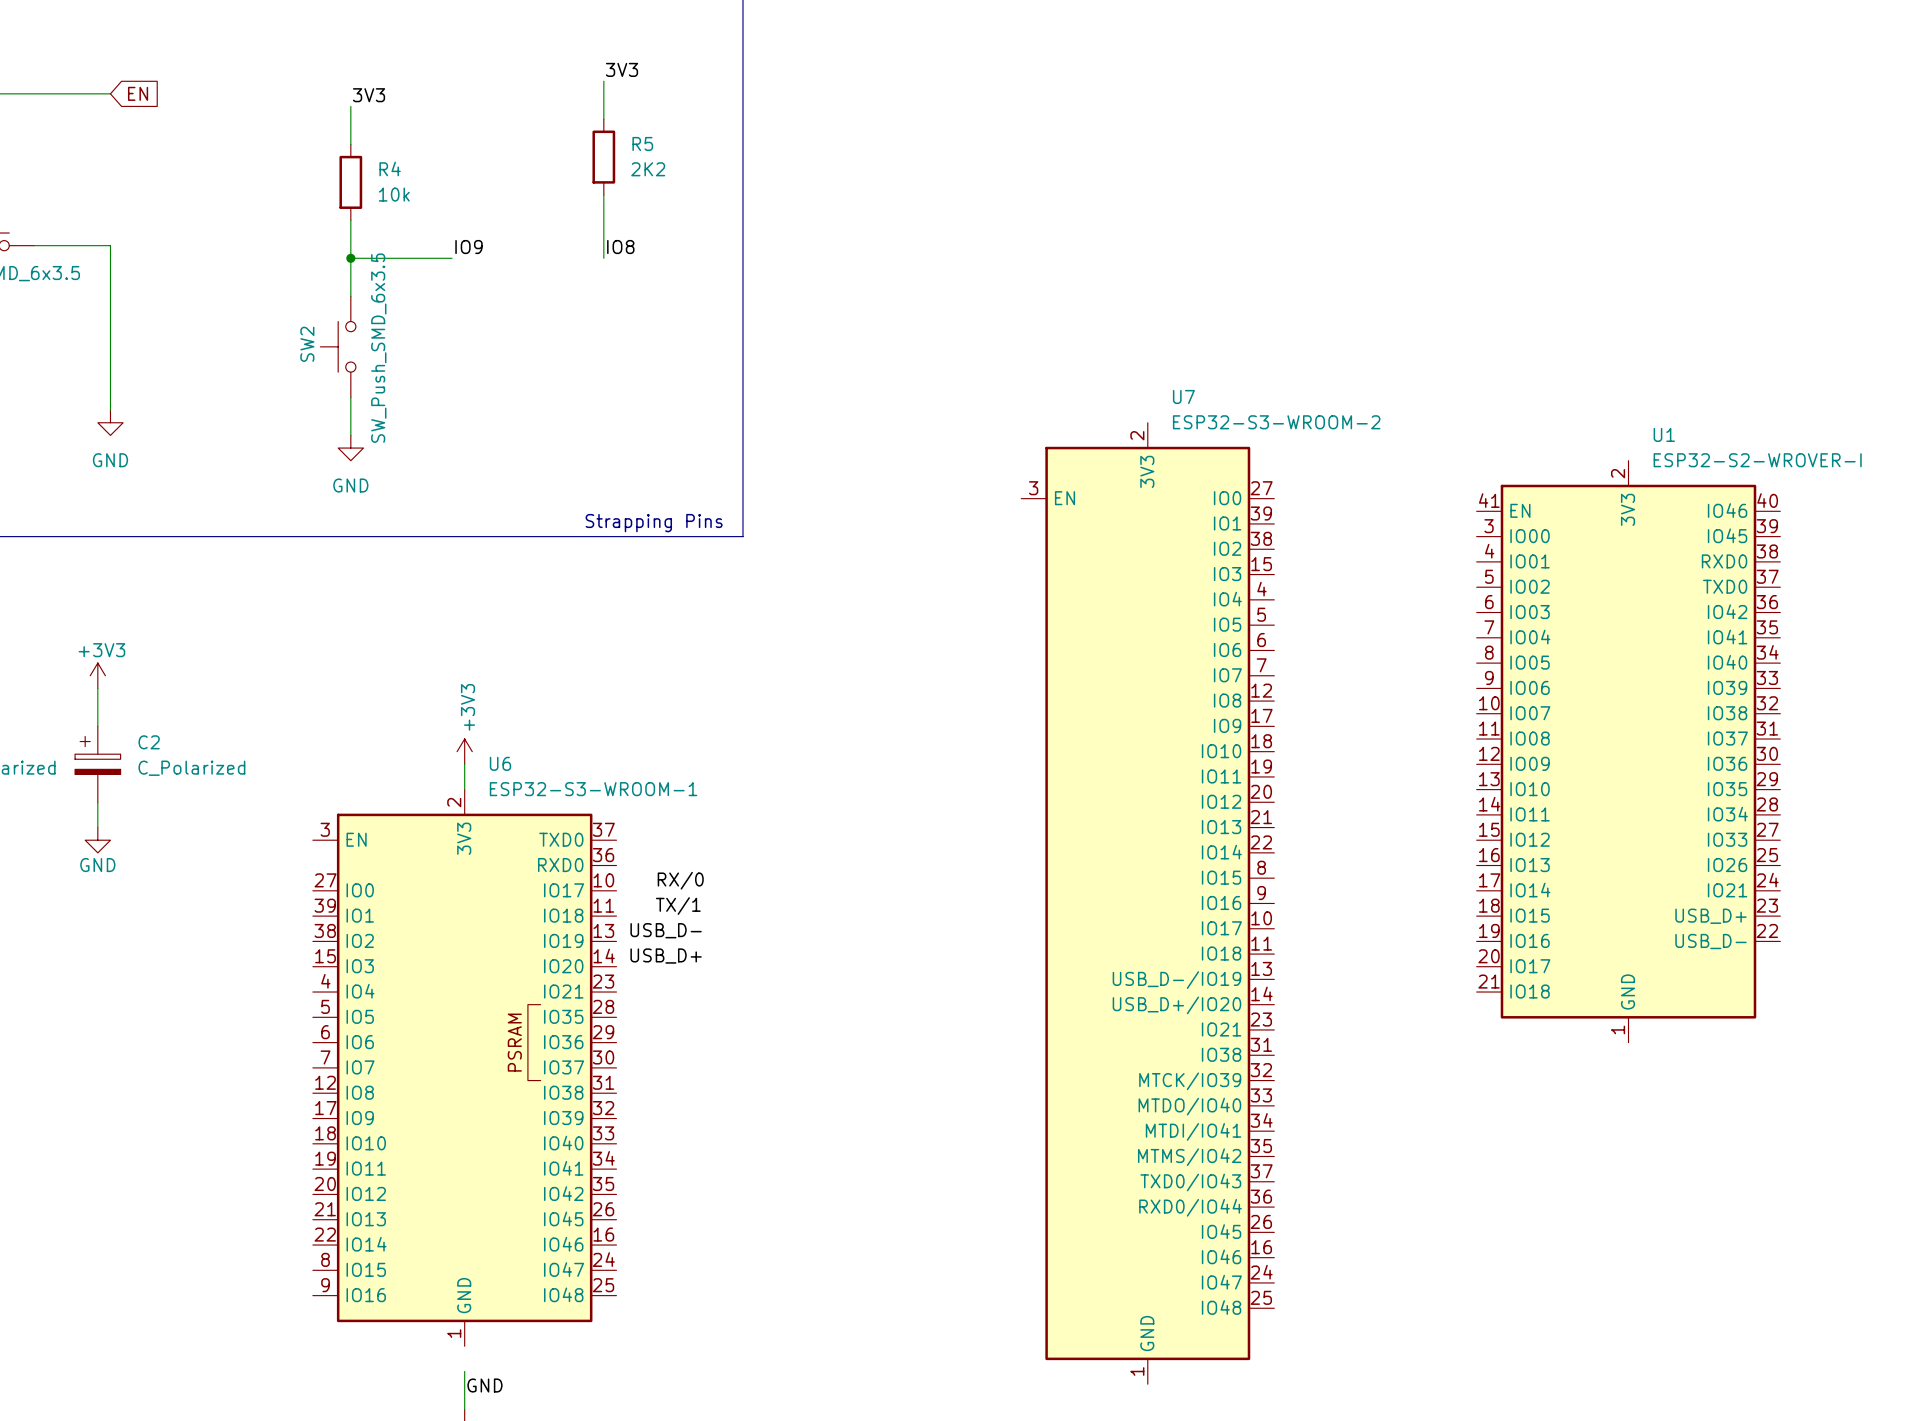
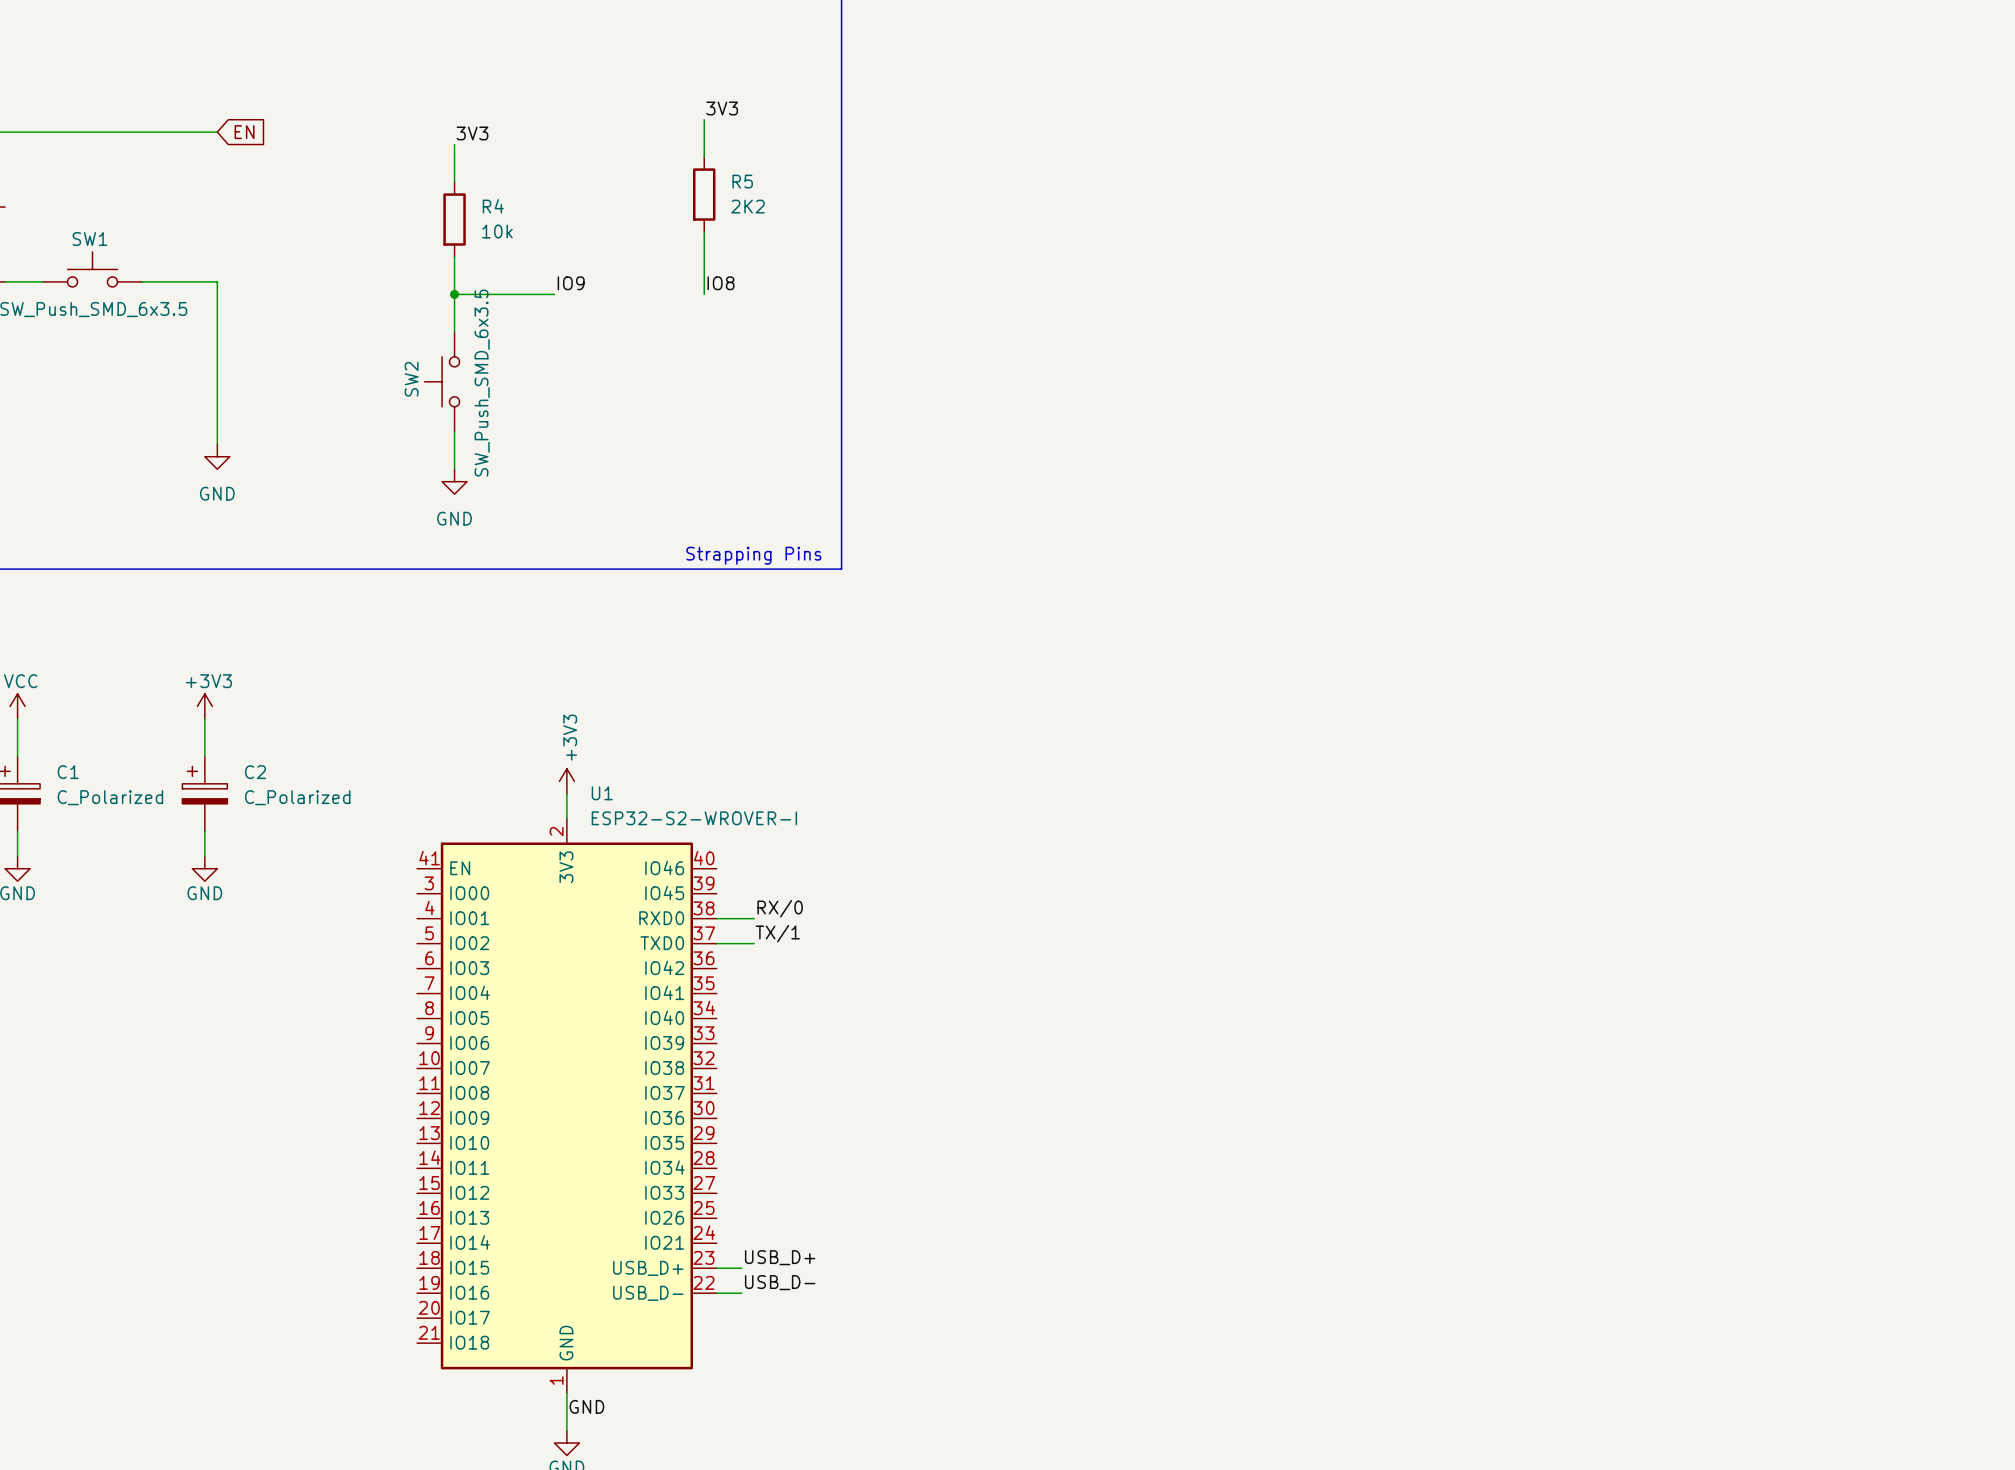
U1 position: (1628, 751) -> (566, 1105)
wire: none -> (716, 918) (754, 918)
U7: ESP32-S3-WROOM-2 (1147, 903) -> none
wire: none -> (716, 943) (754, 943)
label: USB_D- (666, 930) -> none
label: USB_D+ (666, 956) -> none
U6: ESP32-S3-WROOM-1 (464, 1067) -> none
label: none -> USB_D+ (780, 1257)
wire: none -> (716, 1268) (741, 1268)
label: none -> USB_D- (780, 1282)
wire: none -> (716, 1293) (741, 1293)

